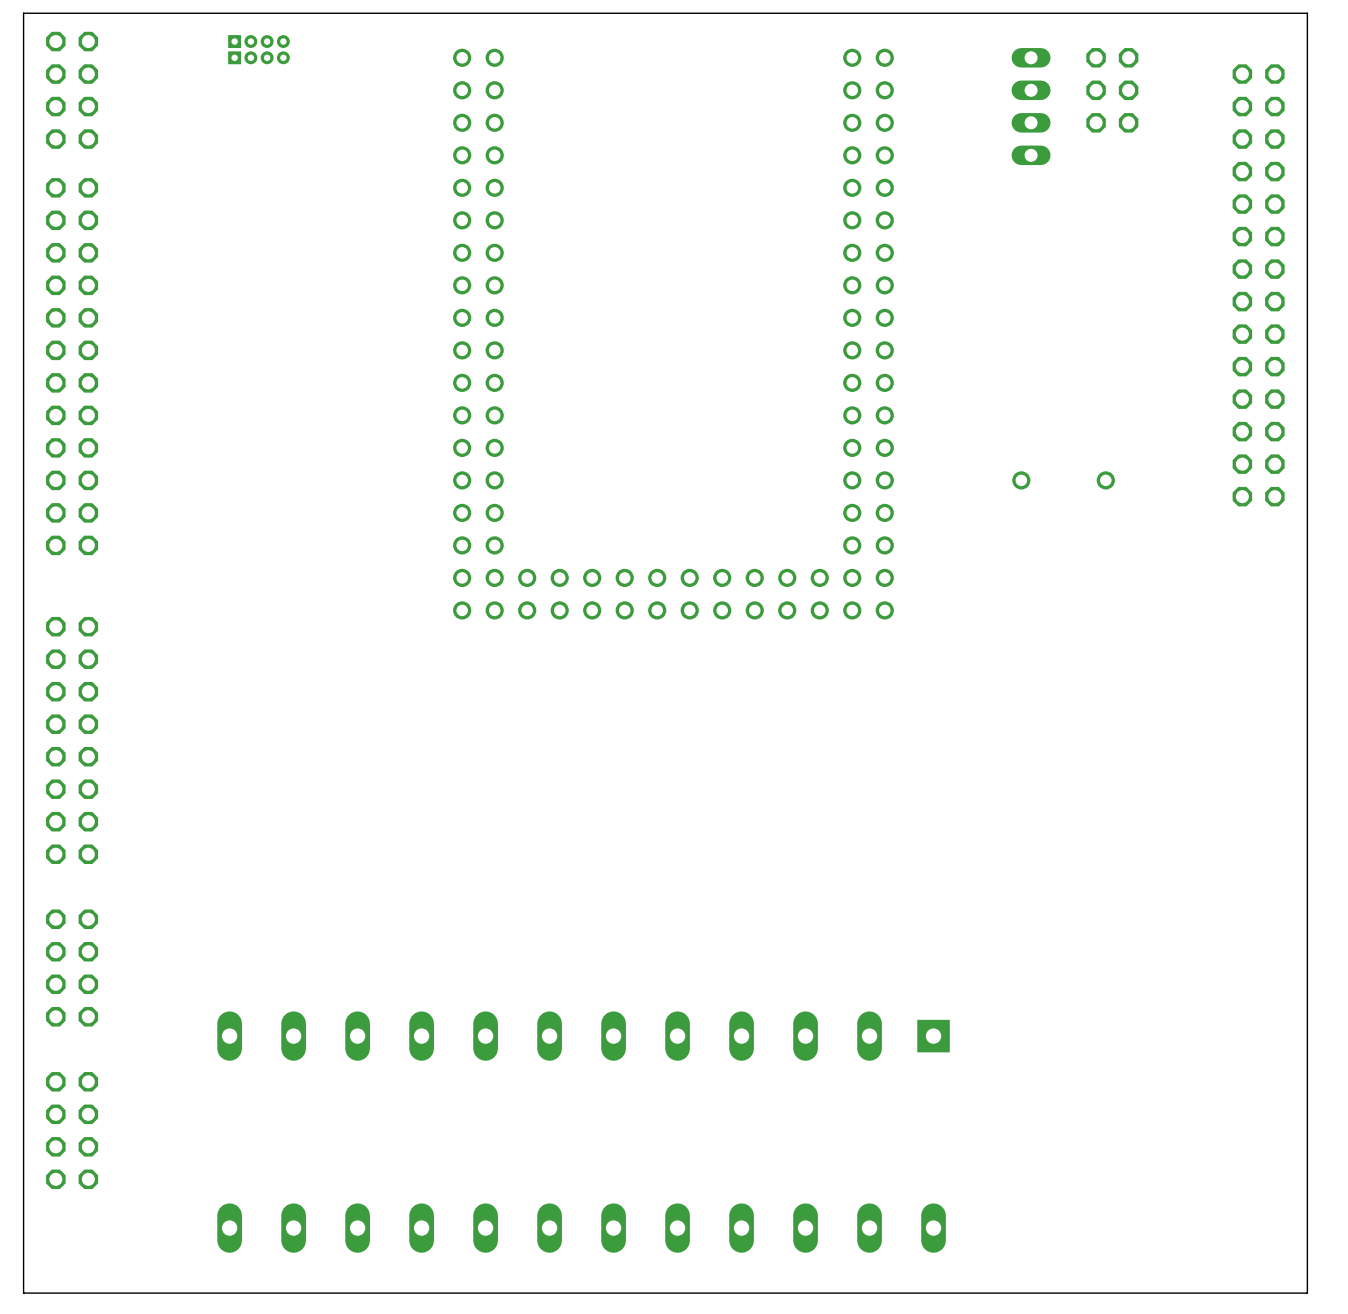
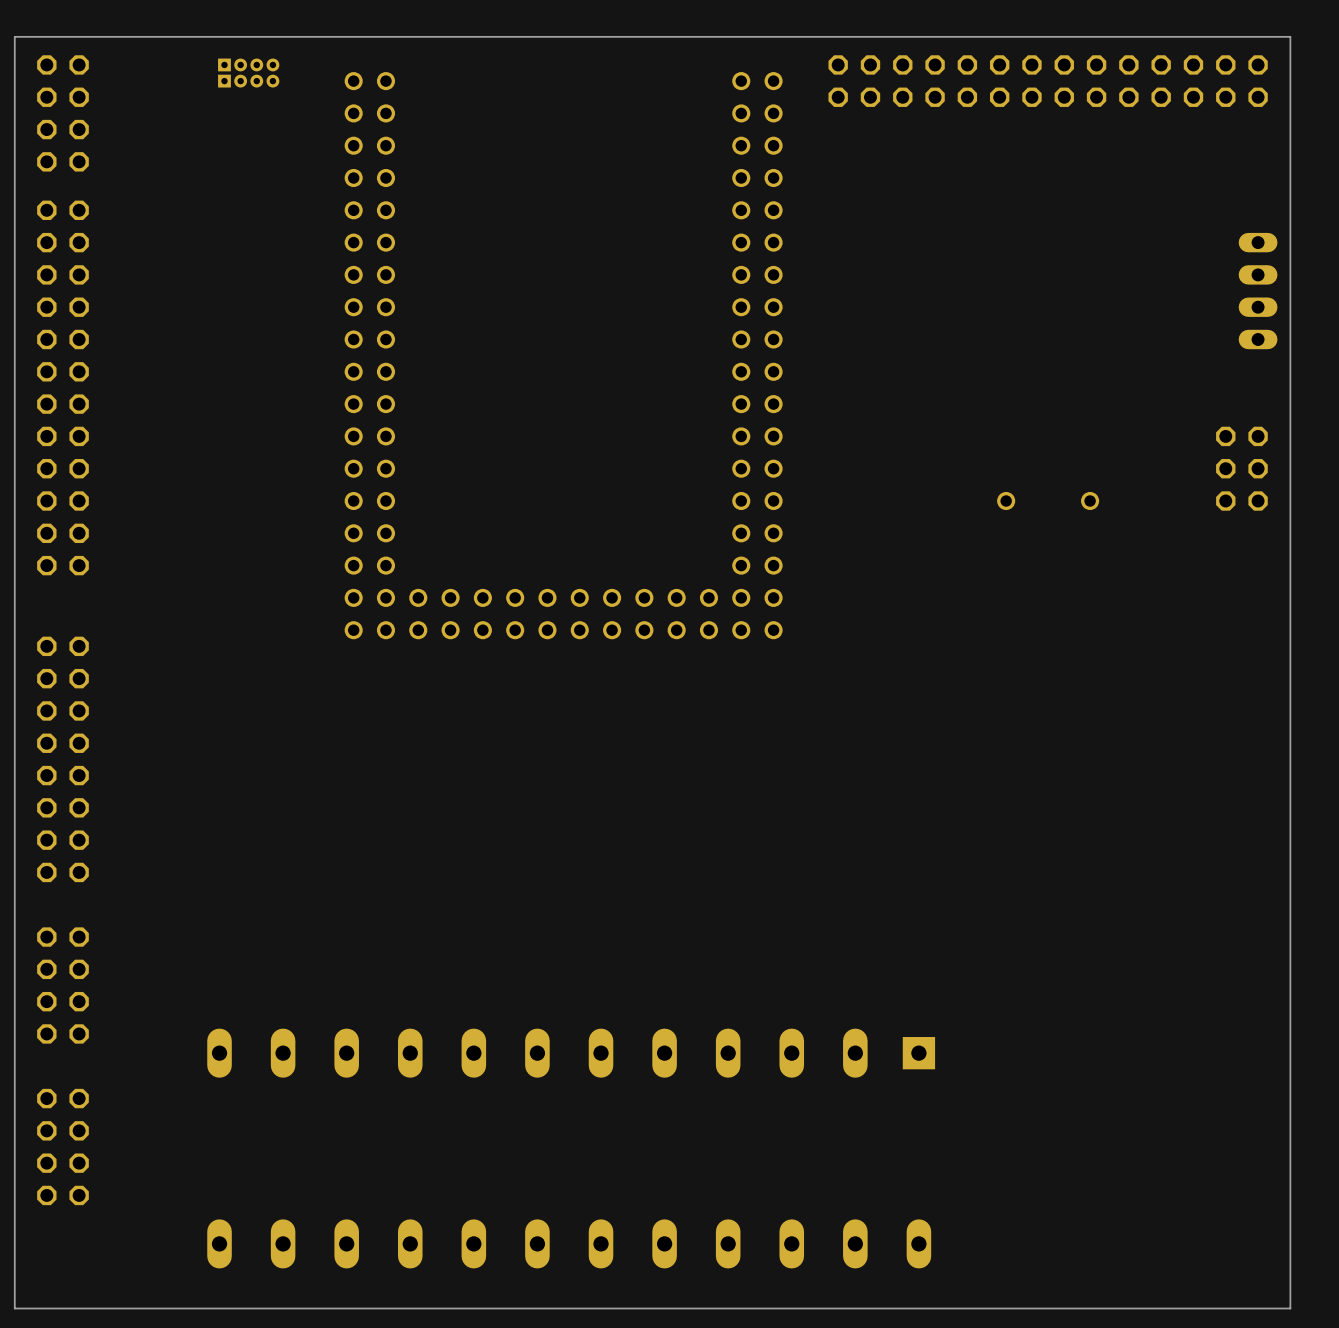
part: (1112, 90) -> none
part position: (1031, 106) -> (1258, 291)
part rotation: 0° (1258, 285) -> 90° clockwise (1048, 81)
part position: (1258, 285) -> (1048, 81)
part position: (673, 334) -> (563, 355)
part: none -> (1241, 468)

